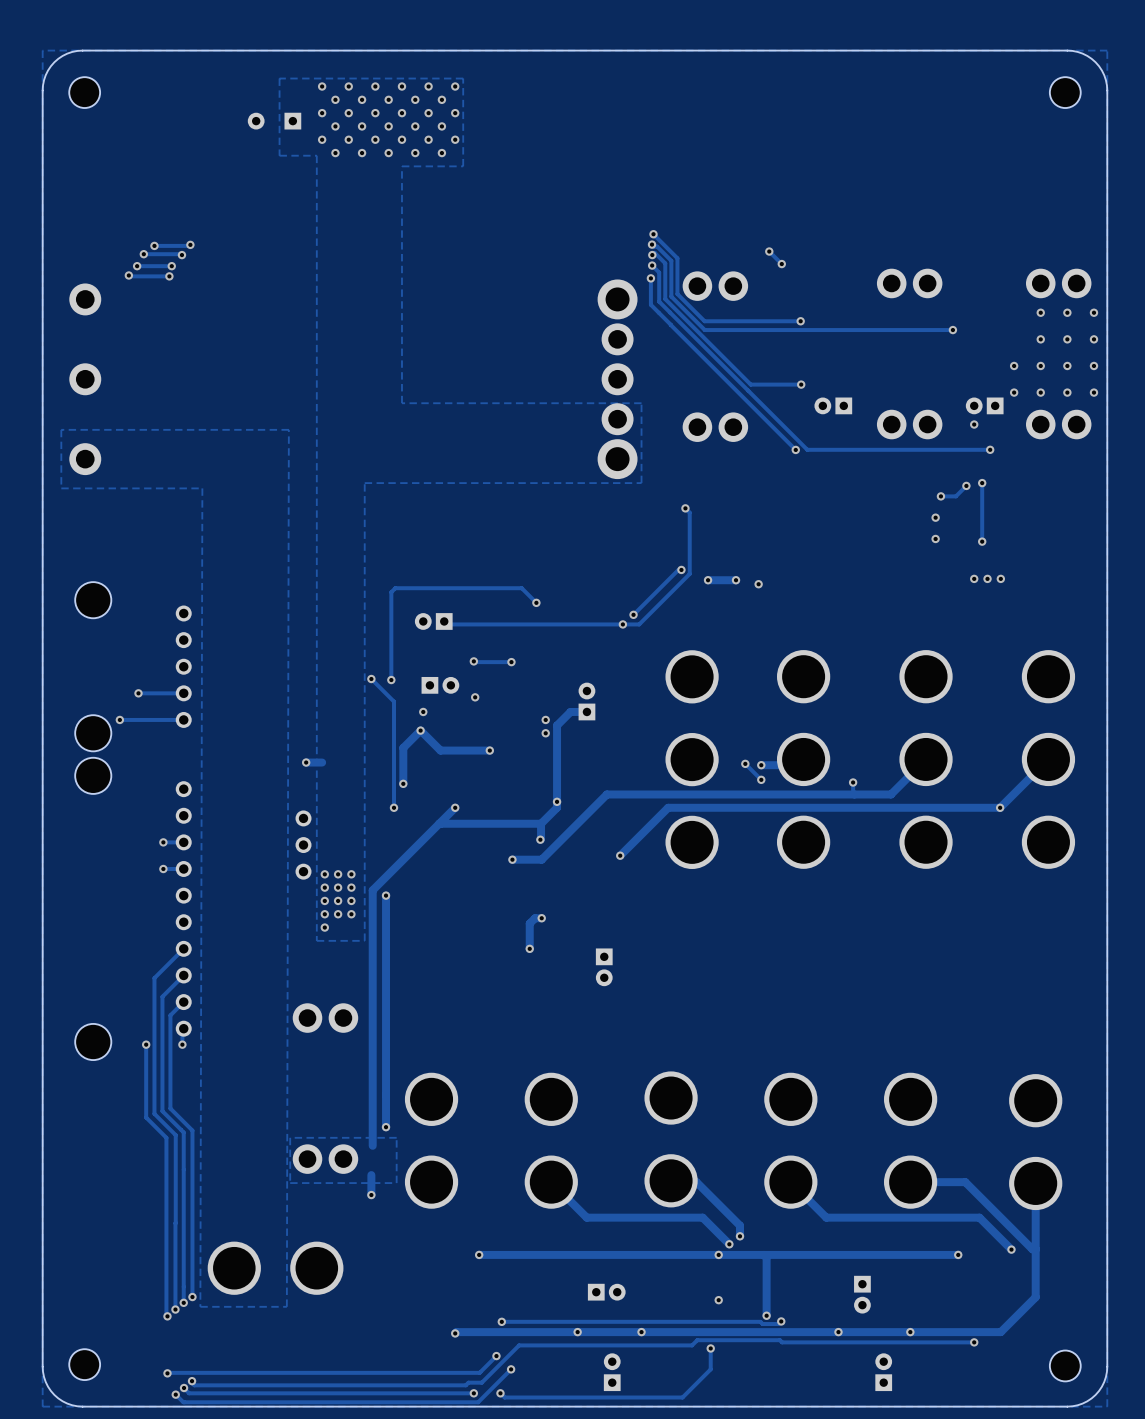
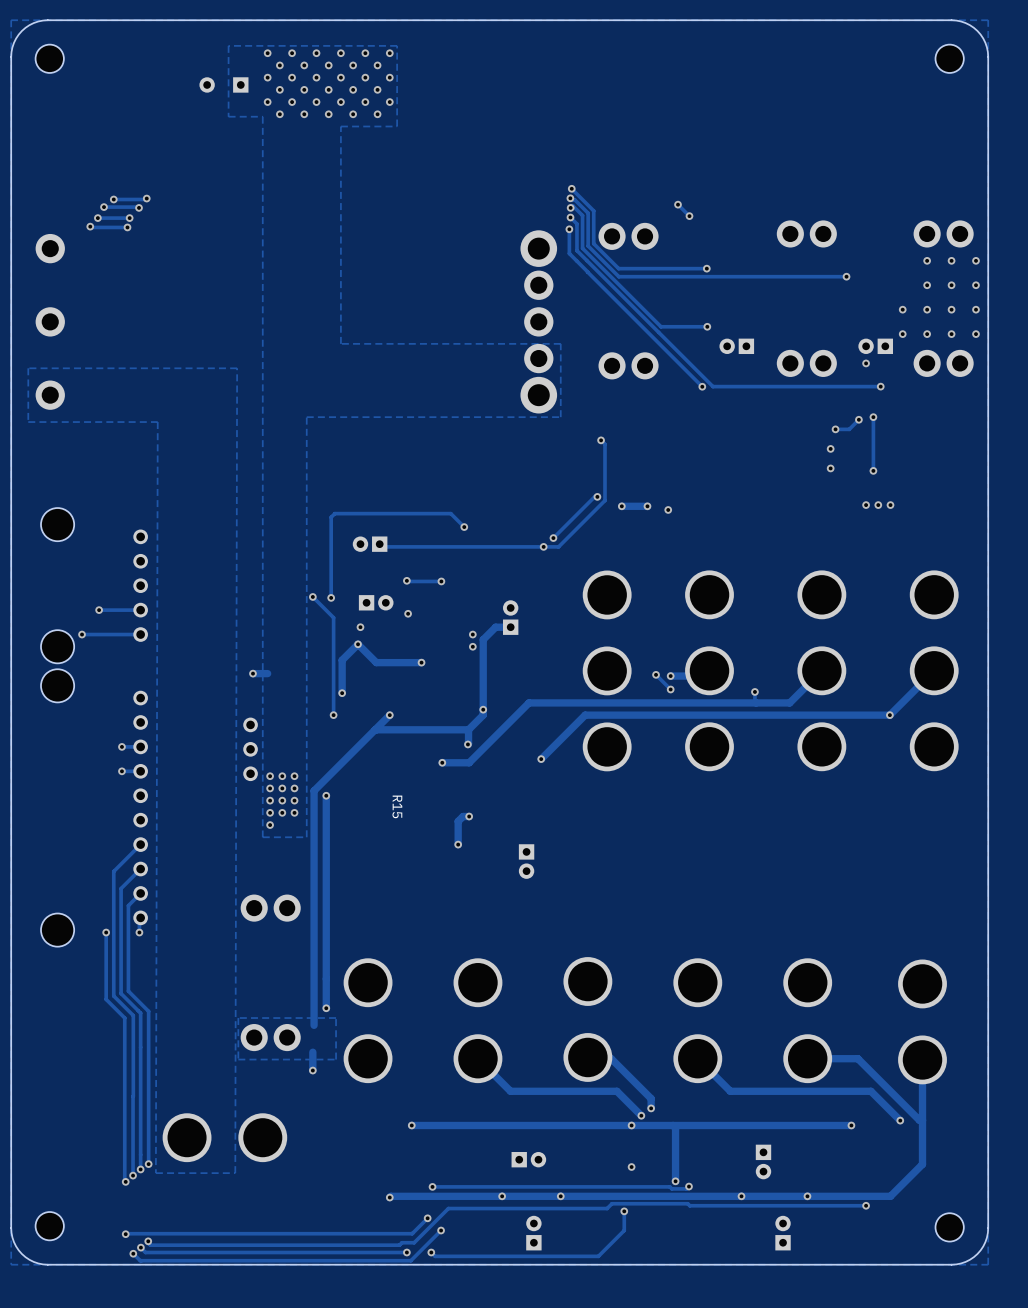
R15: none -> (397, 806)

